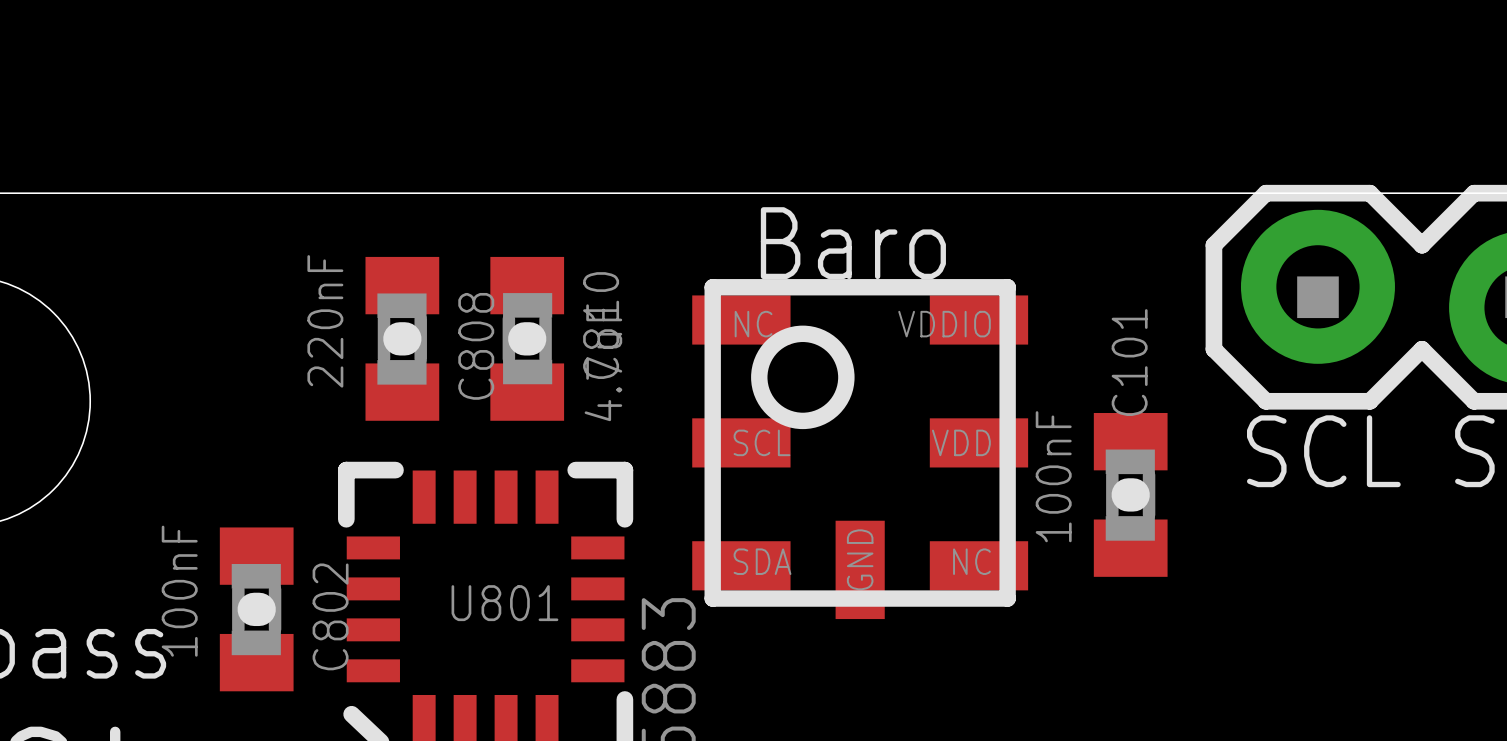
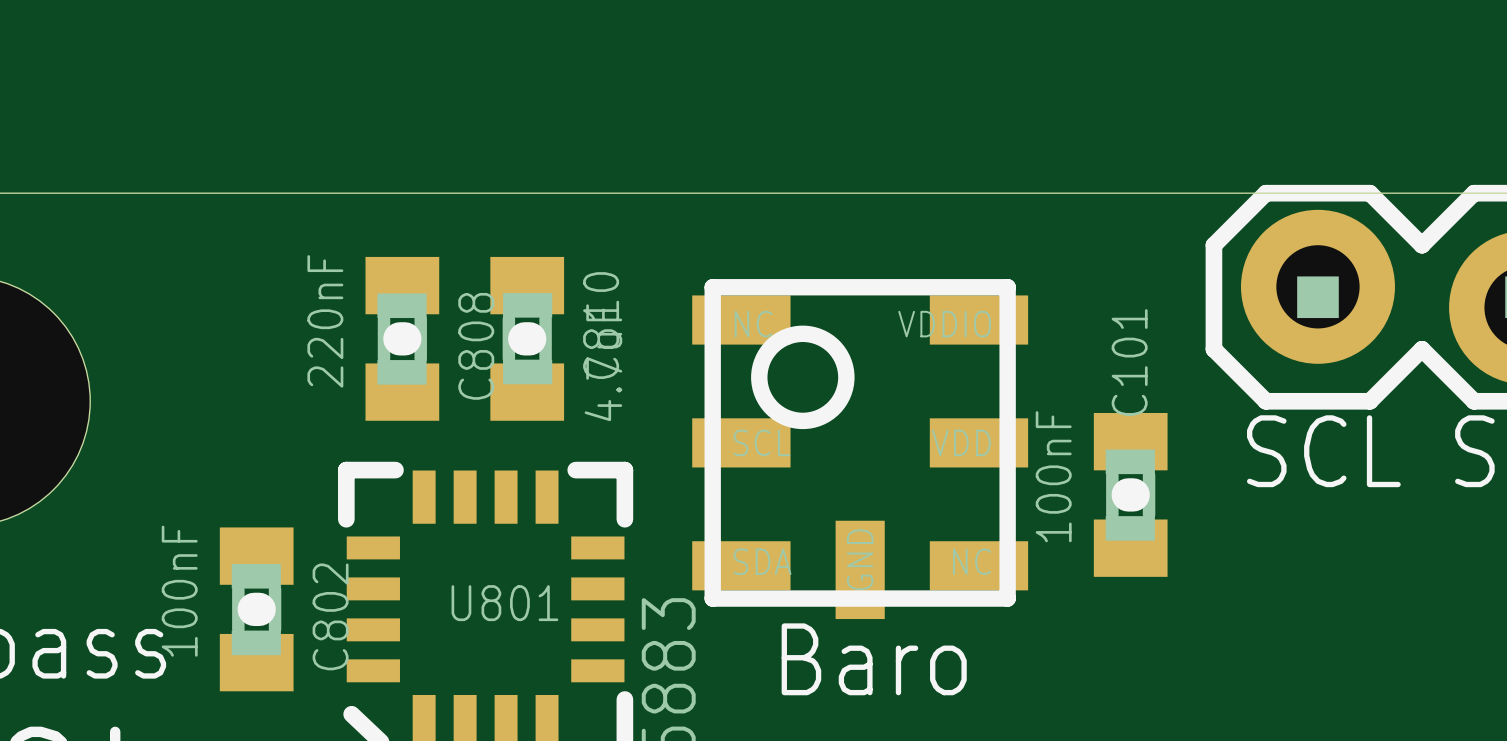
text position: Baro (853, 243) -> Baro (874, 659)

